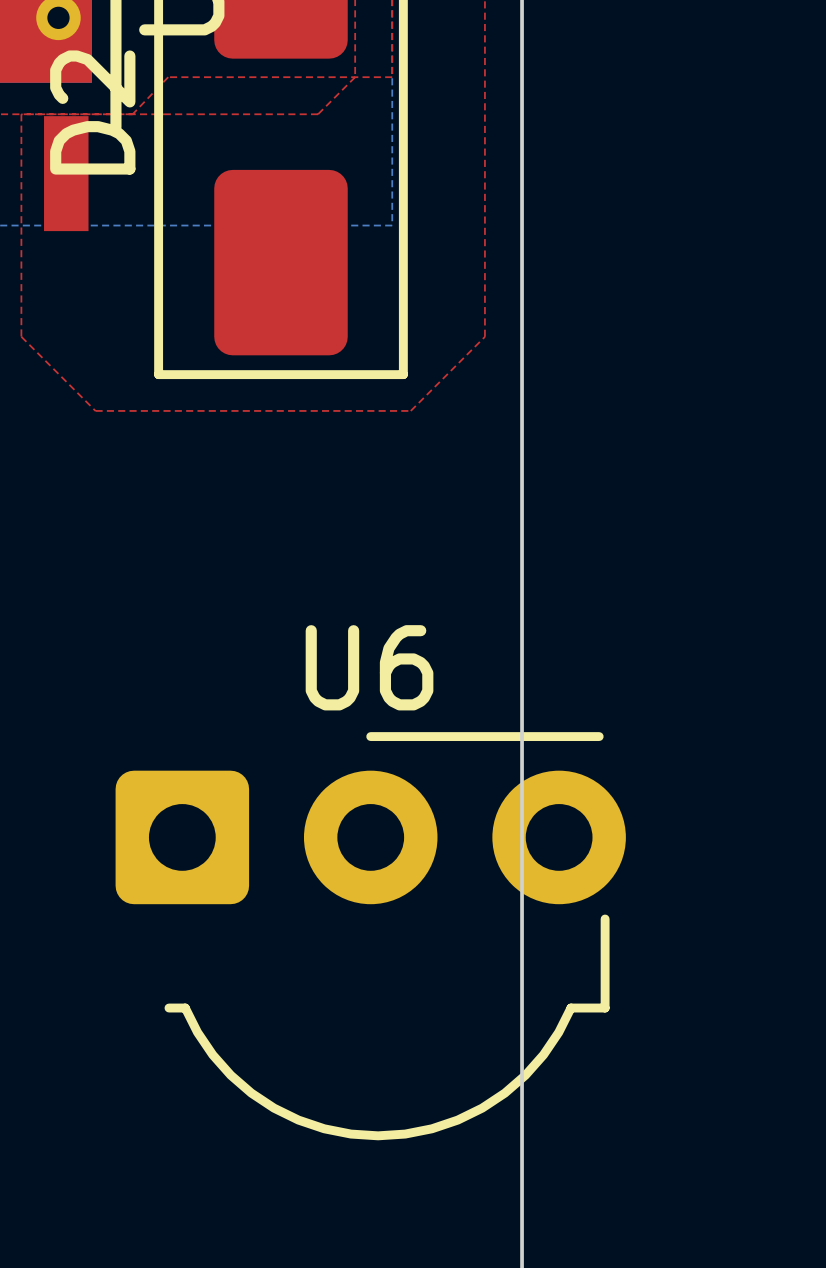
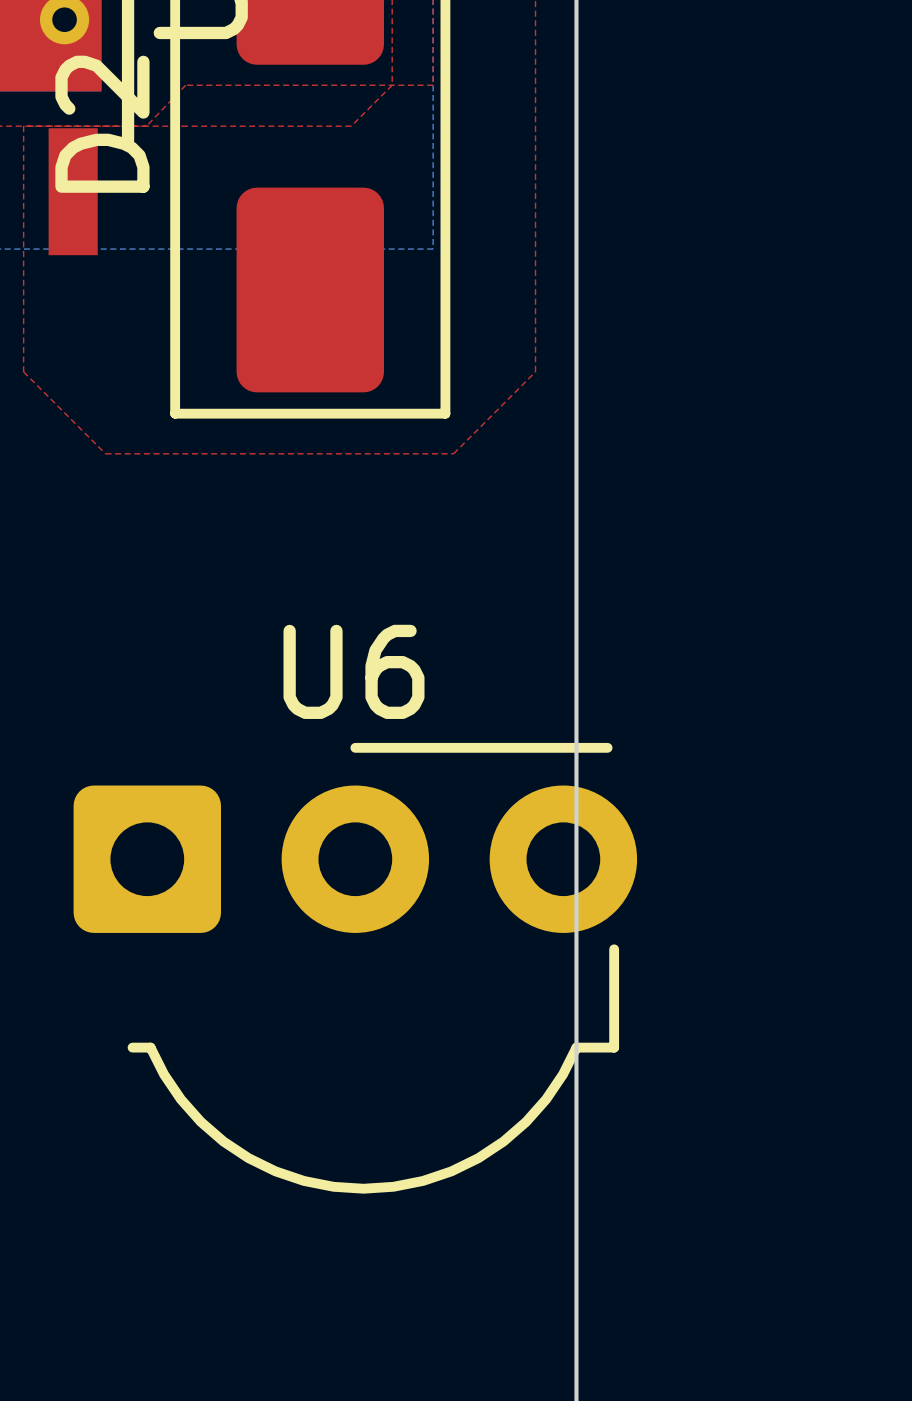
U6 position: (370, 936) -> (355, 968)

